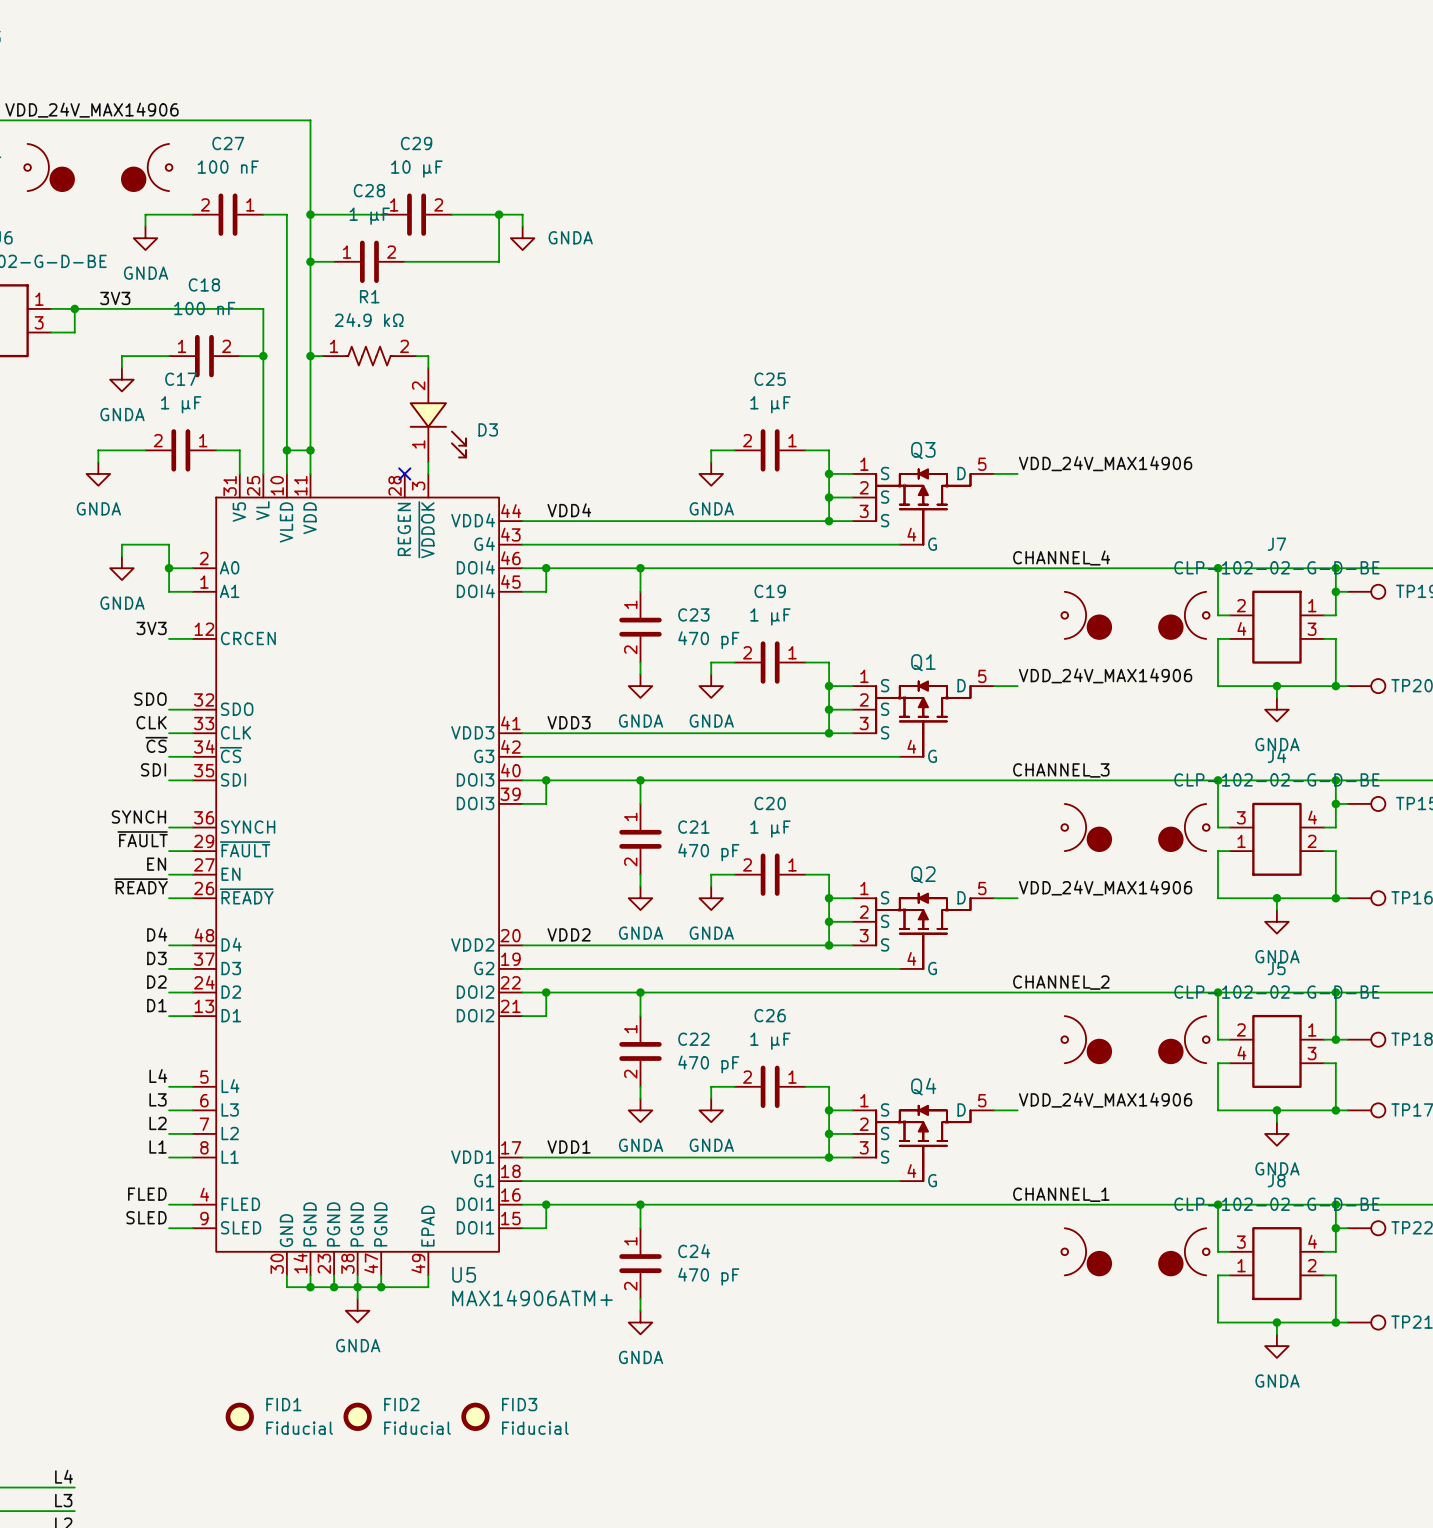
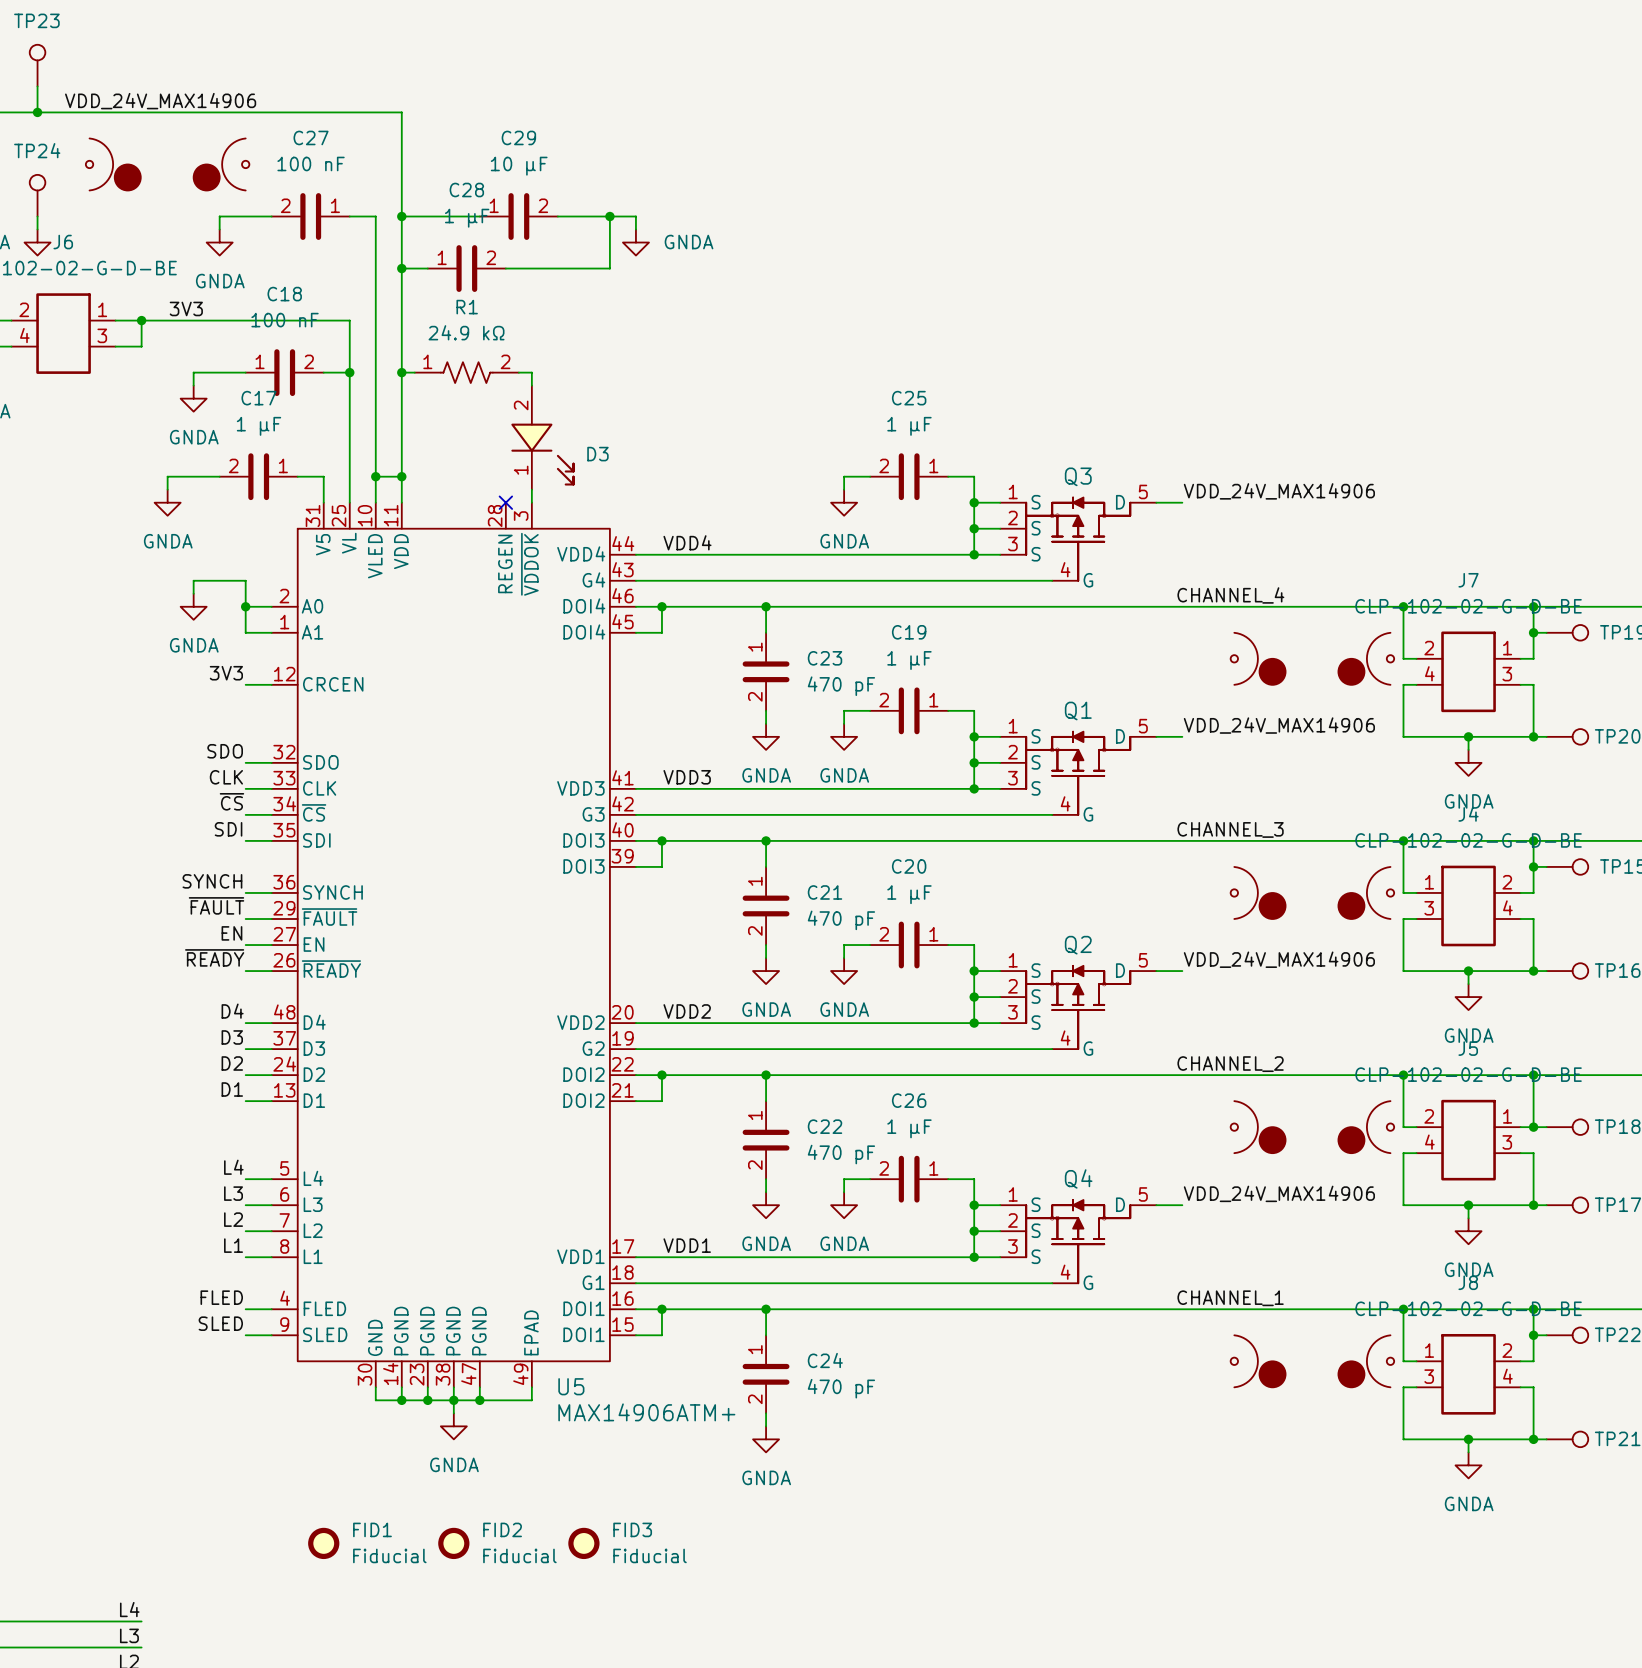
J4 flip: as is (1276, 839) -> up-down (1468, 905)
J8 flip: as is (1276, 1263) -> up-down (1468, 1374)

